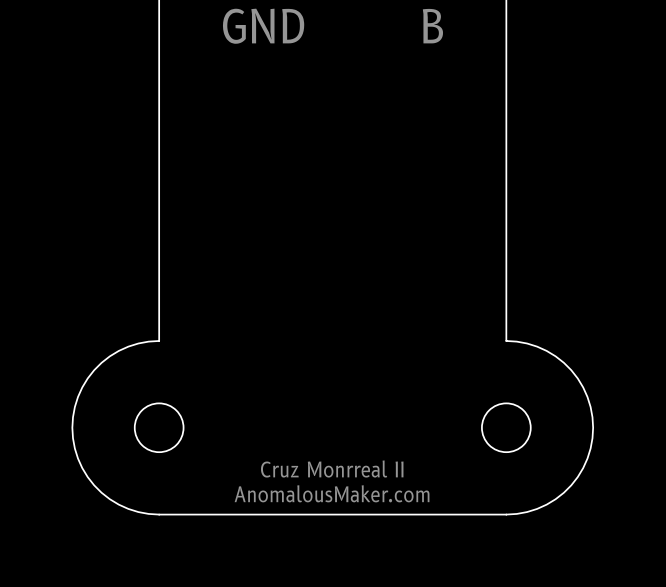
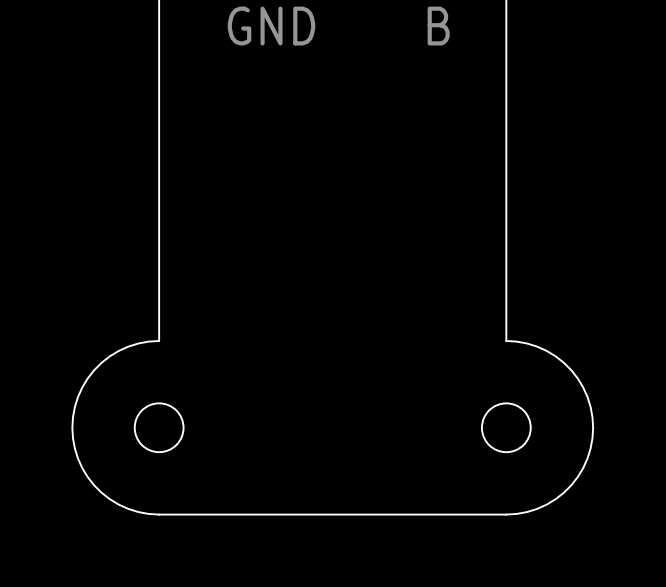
text: Cruz Monrreal II (332, 469) -> none
text: AnomalousMaker.com (332, 493) -> none

